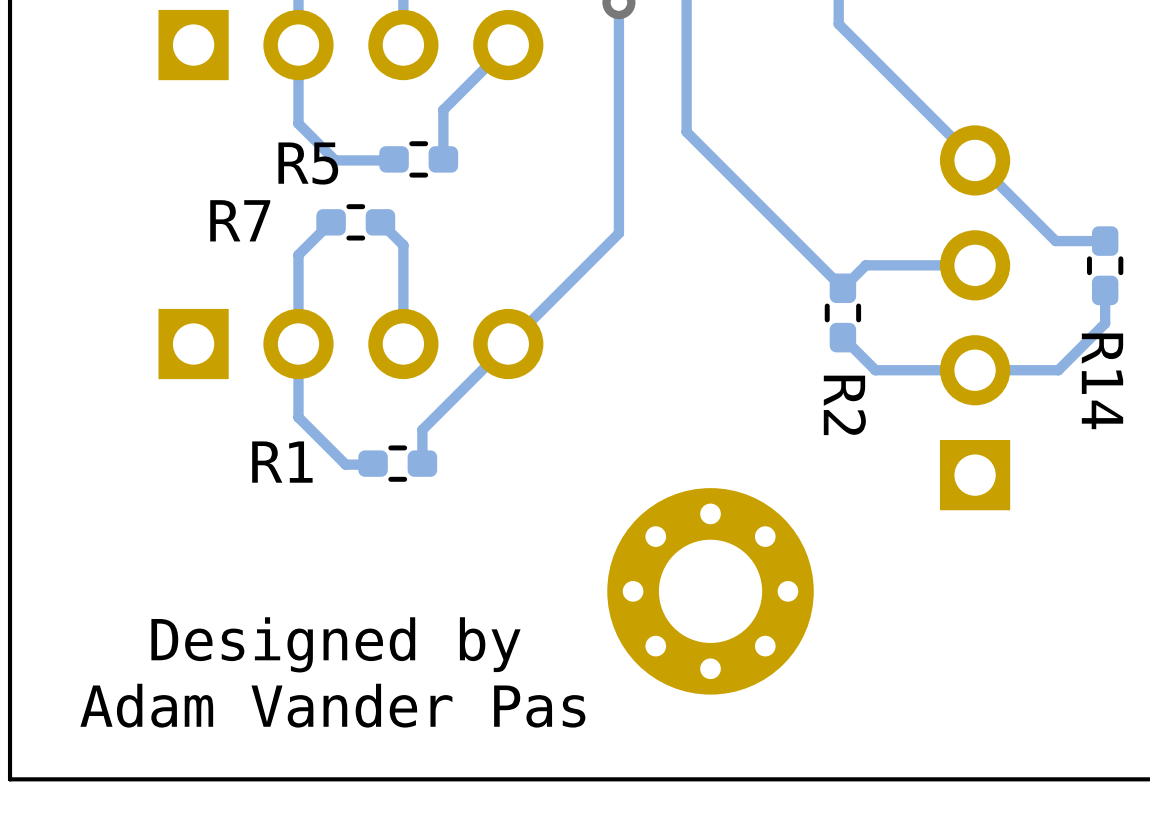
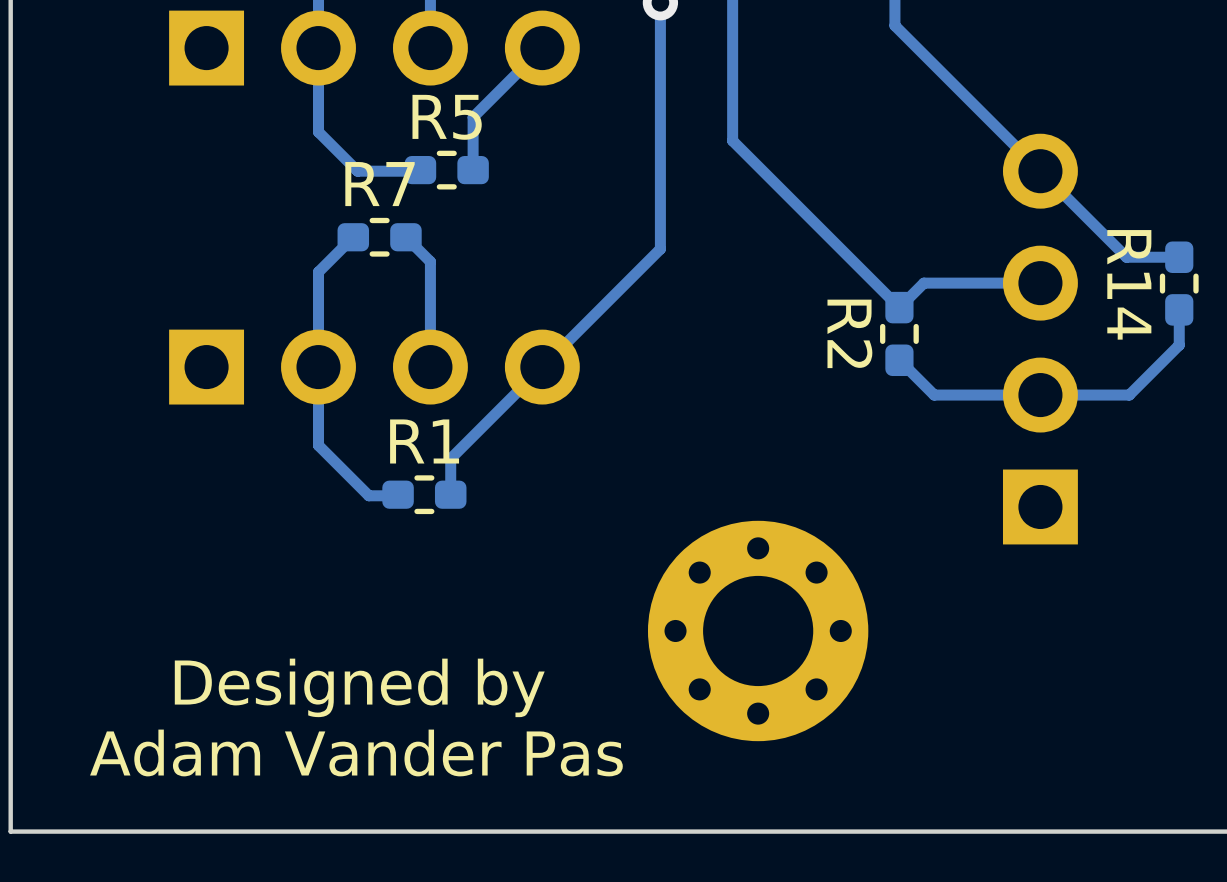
R5 name position: R5 (308, 163) -> R5 (447, 117)
R7 name position: R7 (240, 220) -> R7 (380, 184)
R14 name position: R14 (1102, 381) -> R14 (1129, 284)
R2 name position: R2 (844, 405) -> R2 (849, 333)
R1 name position: R1 (282, 462) -> R1 (424, 441)

